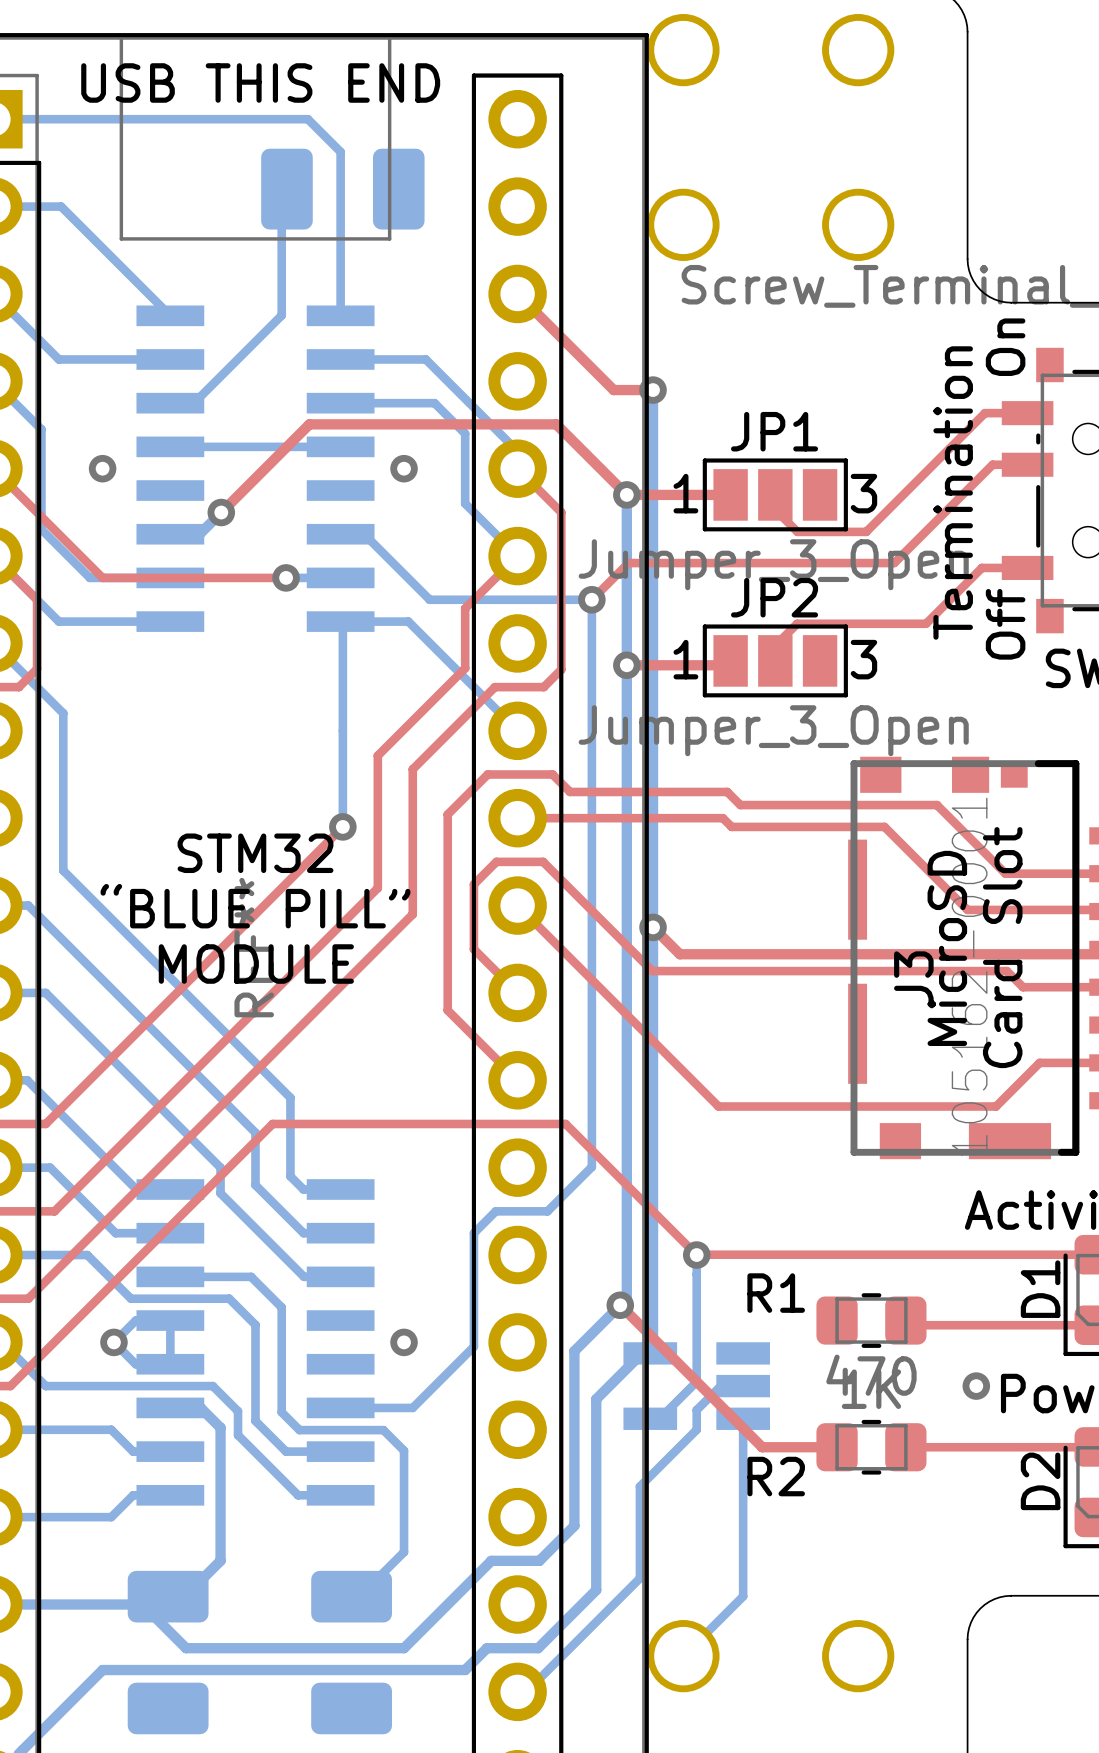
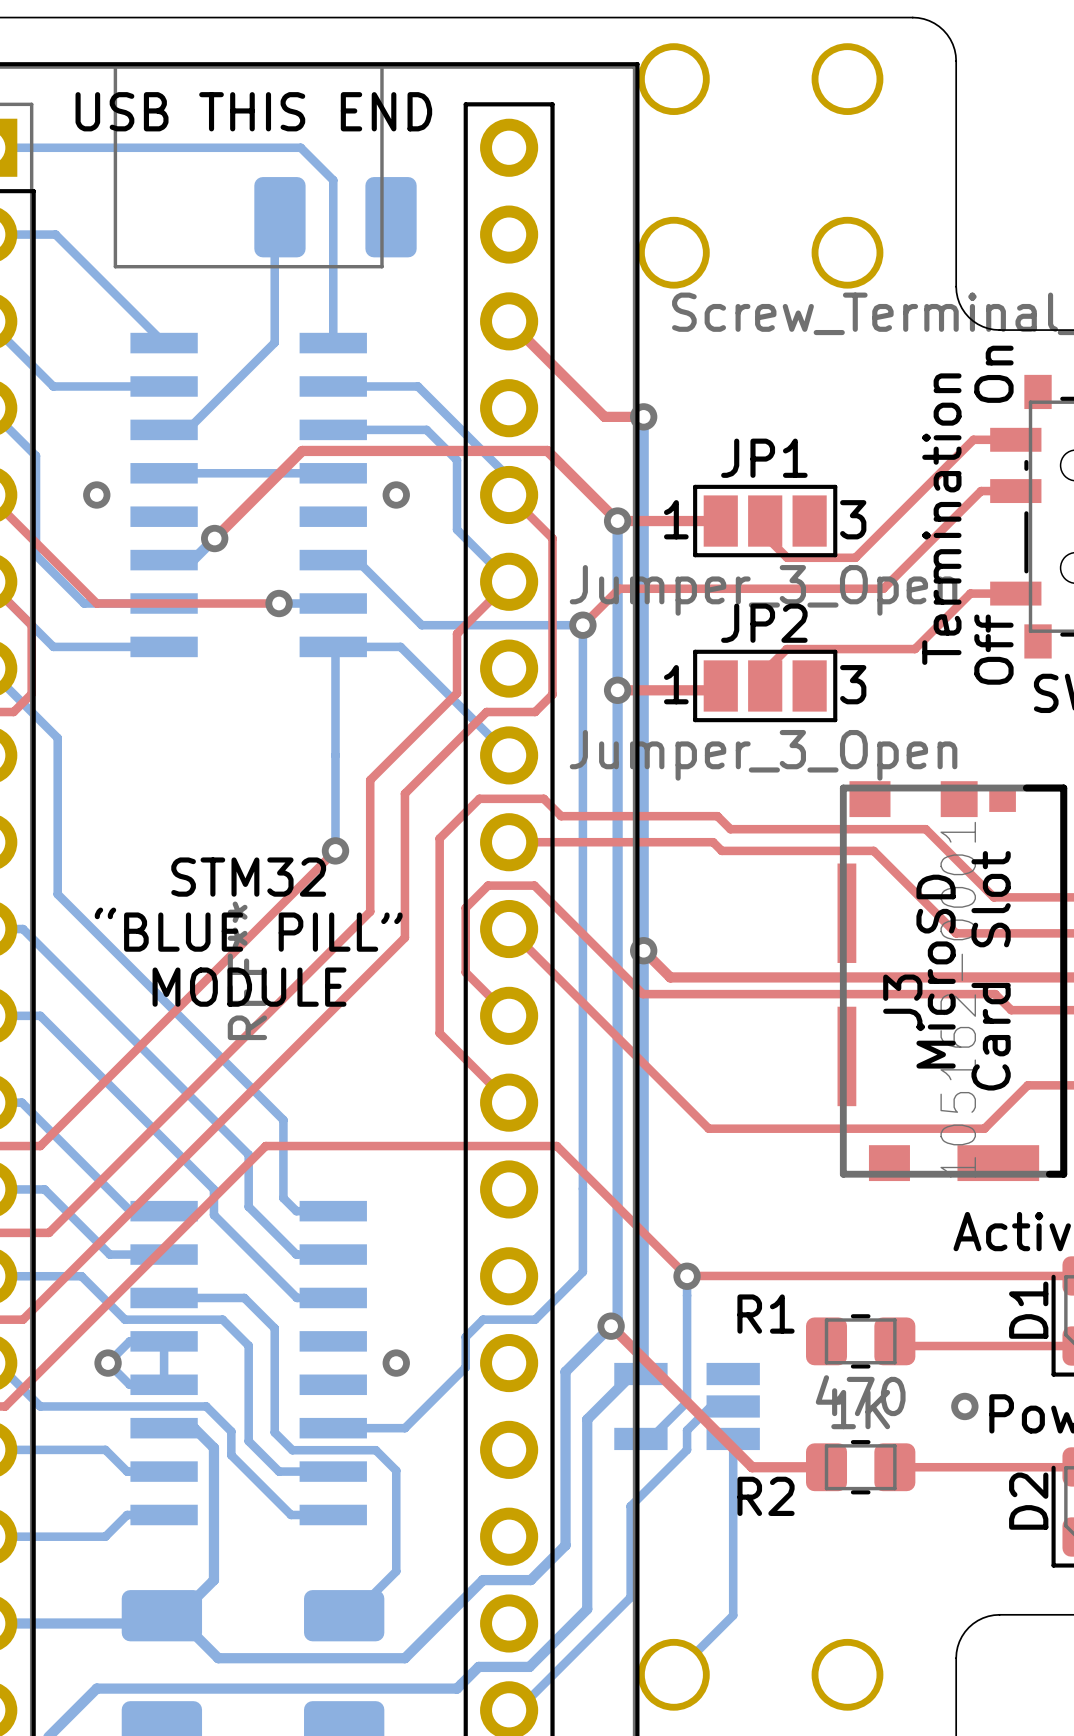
bottom track: (591, 1166) (547, 1211) (495, 1211) (473, 1233) (473, 1316) -> (582, 1188) (582, 1271) (535, 1319) (483, 1319) (465, 1337)
bottom track: (141, 1604) (186, 1648) (404, 1648) (412, 1639) -> (135, 1623) (183, 1623) (218, 1658) (404, 1658)

